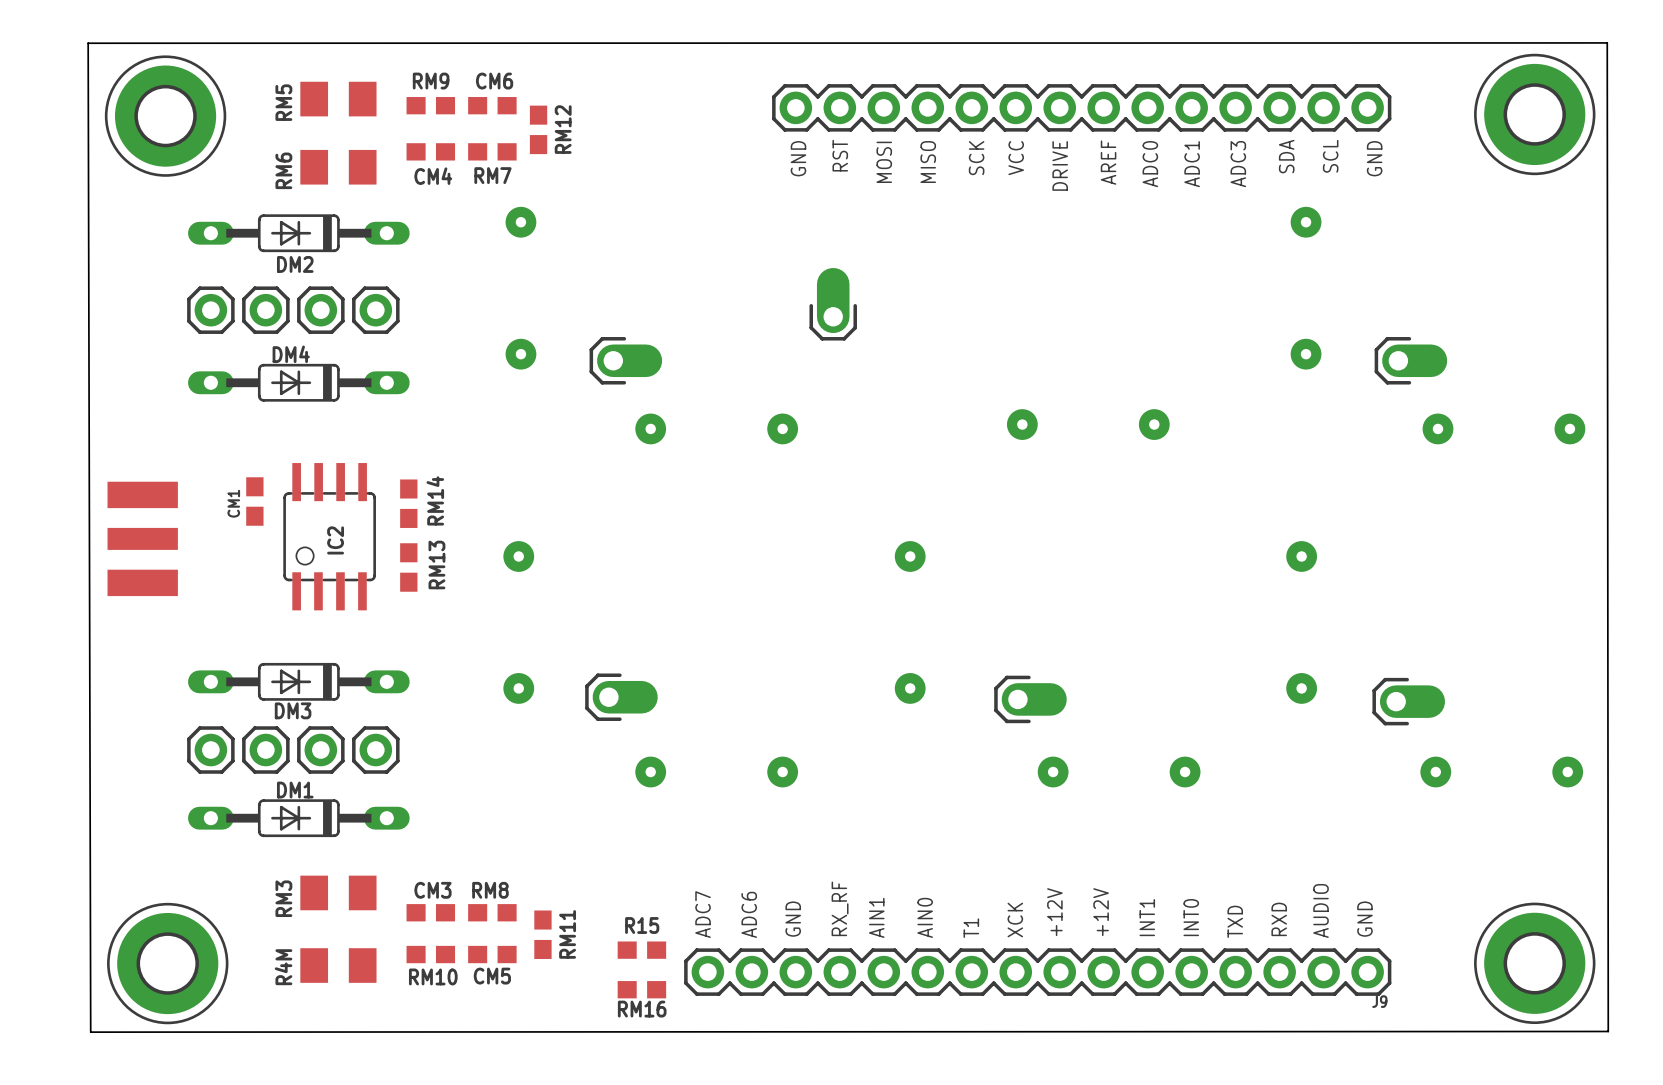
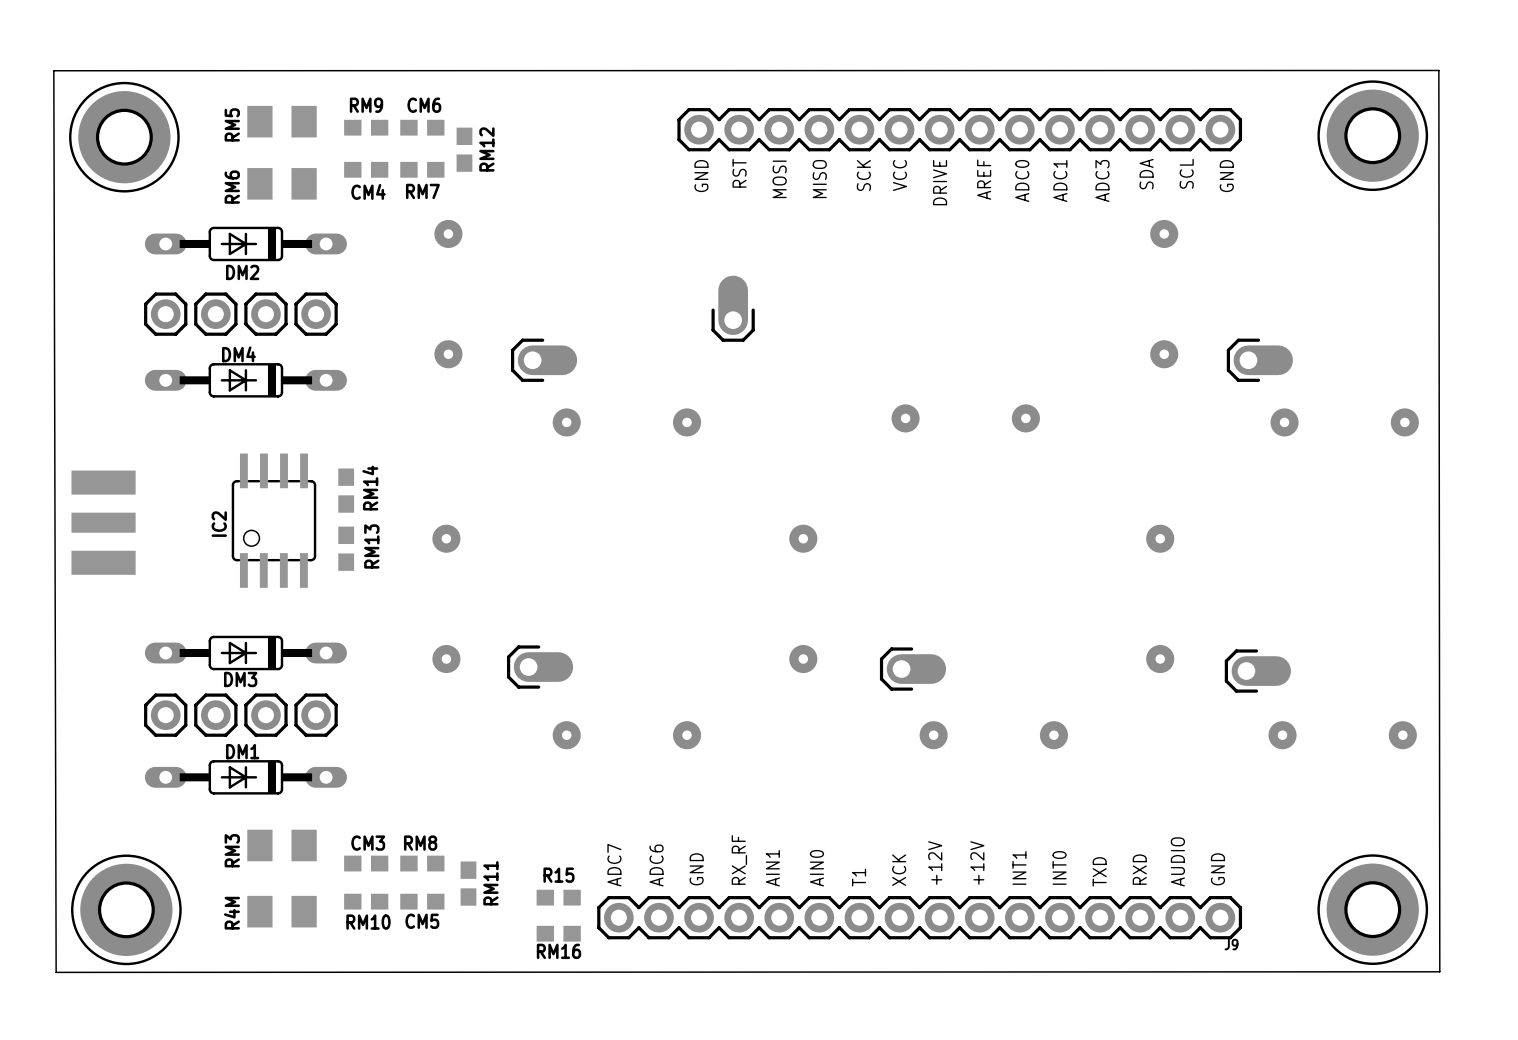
CM1: (254, 501) -> none
IC2 name position: IC2 (335, 540) -> IC2 (219, 524)

